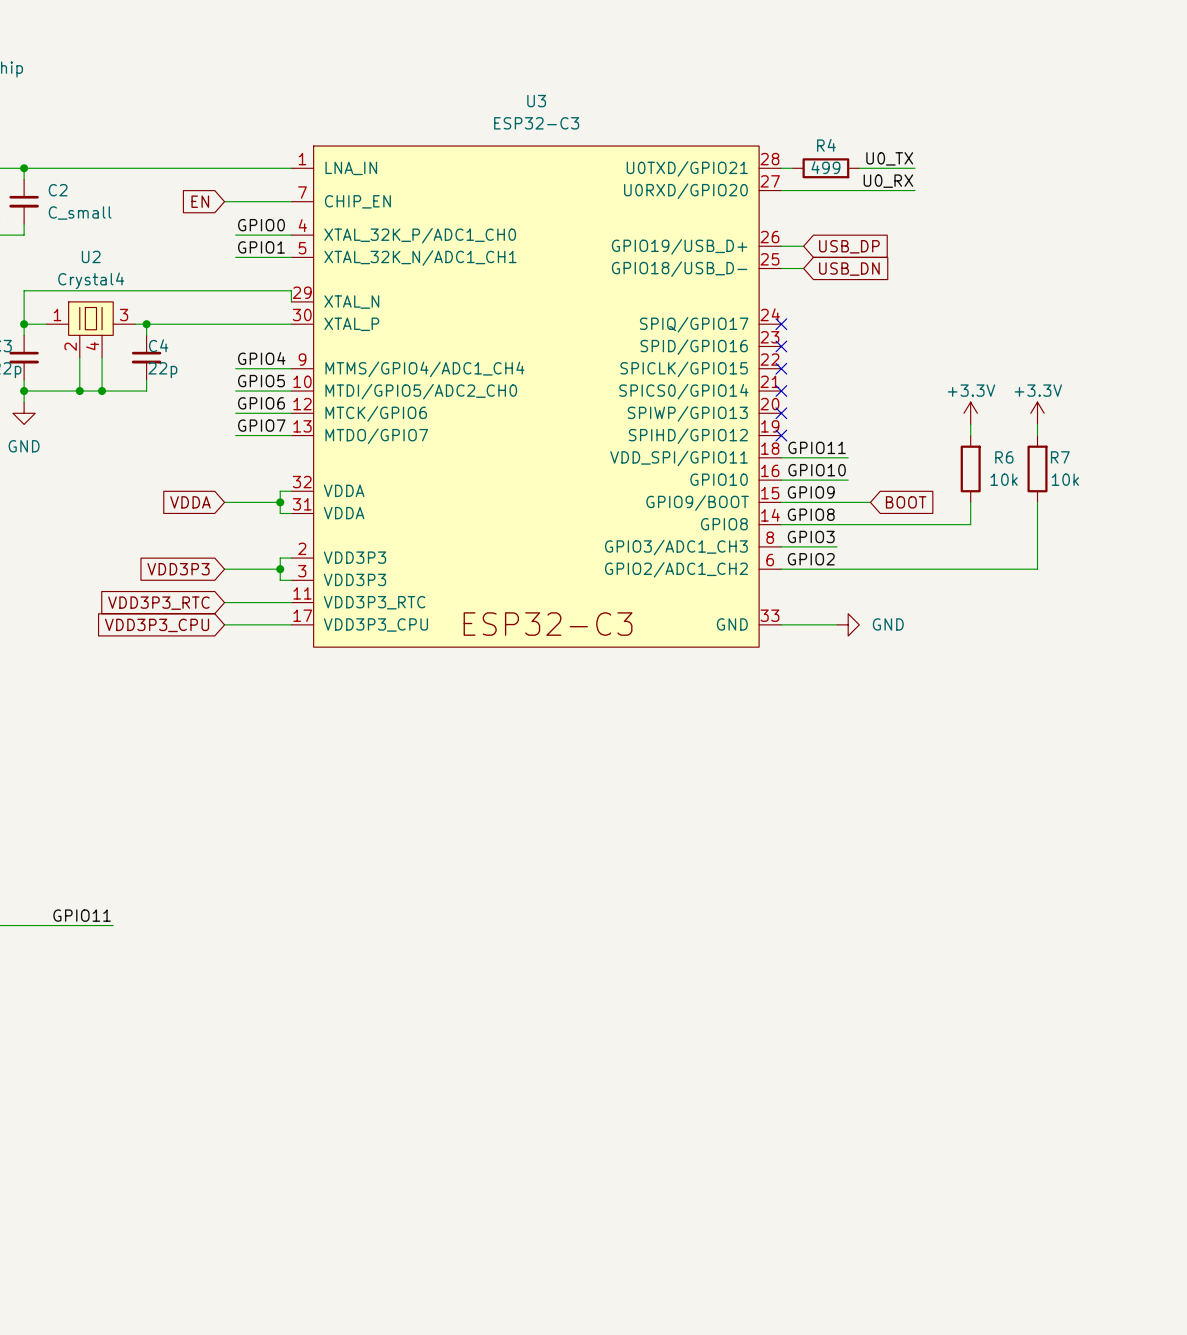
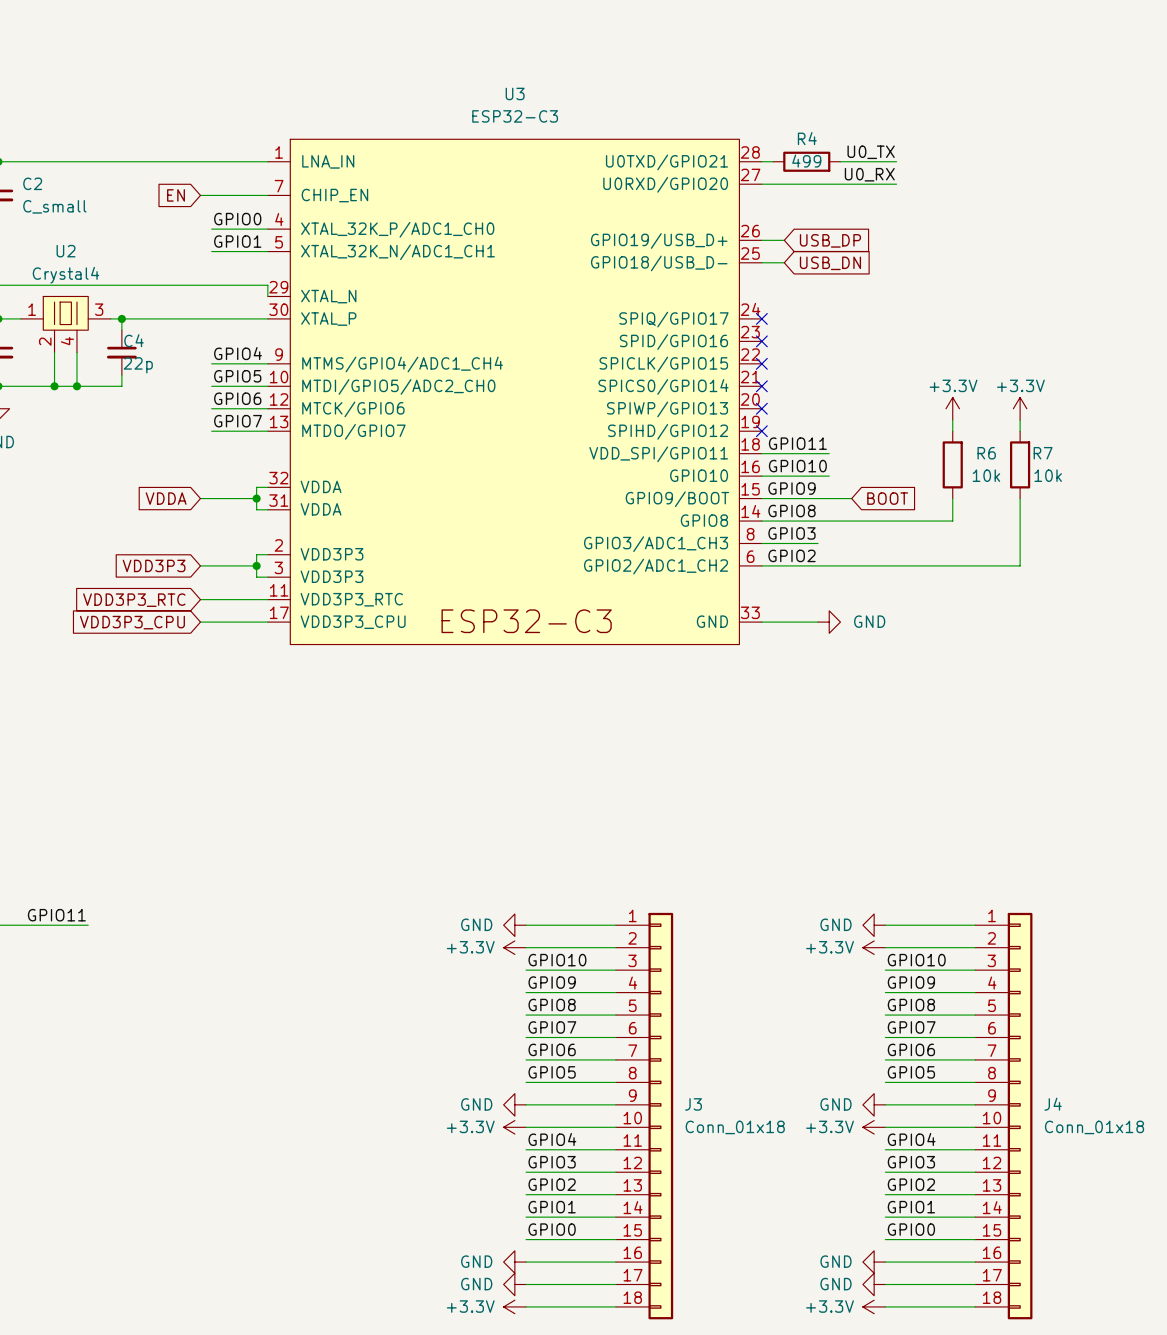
power symbol: none -> GND (514, 925)
wire: none -> (526, 925) (615, 925)
power symbol: none -> GND (874, 925)
wire: none -> (885, 925) (975, 925)
power symbol: none -> +3.3V (514, 947)
wire: none -> (526, 947) (615, 947)
power symbol: none -> +3.3V (874, 947)
wire: none -> (885, 947) (975, 947)
label: none -> GPIO10 (557, 960)
label: none -> GPIO10 (916, 960)
wire: none -> (526, 970) (615, 970)
wire: none -> (885, 970) (975, 970)
label: none -> GPIO9 (552, 982)
label: none -> GPIO9 (911, 982)
wire: none -> (526, 992) (615, 992)
wire: none -> (885, 992) (975, 992)
label: none -> GPIO8 (552, 1005)
label: none -> GPIO8 (911, 1005)
wire: none -> (526, 1015) (615, 1015)
wire: none -> (885, 1015) (975, 1015)
label: none -> GPIO7 (552, 1027)
label: none -> GPIO7 (911, 1027)
wire: none -> (526, 1037) (615, 1037)
wire: none -> (885, 1037) (975, 1037)
label: none -> GPIO6 (552, 1049)
label: none -> GPIO6 (911, 1049)
wire: none -> (526, 1059) (615, 1059)
wire: none -> (885, 1059) (975, 1059)
label: none -> GPIO5 (552, 1072)
label: none -> GPIO5 (911, 1072)
wire: none -> (526, 1082) (615, 1082)
wire: none -> (885, 1082) (975, 1082)
power symbol: none -> GND (514, 1104)
wire: none -> (526, 1104) (615, 1104)
power symbol: none -> GND (874, 1104)
wire: none -> (885, 1104) (975, 1104)
J3: none -> Conn_01x18 (644, 1116)
J4: none -> Conn_01x18 (1003, 1116)
power symbol: none -> +3.3V (514, 1127)
wire: none -> (526, 1127) (615, 1127)
power symbol: none -> +3.3V (874, 1127)
wire: none -> (885, 1127) (975, 1127)
label: none -> GPIO4 (552, 1139)
label: none -> GPIO4 (911, 1139)
wire: none -> (526, 1149) (615, 1149)
wire: none -> (885, 1149) (975, 1149)
label: none -> GPIO3 (552, 1162)
label: none -> GPIO3 (911, 1162)
wire: none -> (526, 1172) (615, 1172)
wire: none -> (885, 1172) (975, 1172)
label: none -> GPIO2 (552, 1184)
label: none -> GPIO2 (911, 1184)
wire: none -> (526, 1194) (615, 1194)
wire: none -> (885, 1194) (975, 1194)
label: none -> GPIO1 (552, 1207)
label: none -> GPIO1 (911, 1207)
wire: none -> (526, 1217) (615, 1217)
wire: none -> (885, 1217) (975, 1217)
label: none -> GPIO0 (552, 1229)
label: none -> GPIO0 (911, 1229)
wire: none -> (526, 1239) (615, 1239)
wire: none -> (885, 1239) (975, 1239)
power symbol: none -> GND (514, 1262)
wire: none -> (526, 1262) (615, 1262)
power symbol: none -> GND (874, 1262)
wire: none -> (885, 1262) (975, 1262)
power symbol: none -> GND (514, 1284)
wire: none -> (526, 1284) (615, 1284)
power symbol: none -> GND (874, 1284)
wire: none -> (885, 1284) (975, 1284)
power symbol: none -> +3.3V (514, 1306)
wire: none -> (526, 1306) (615, 1306)
power symbol: none -> +3.3V (874, 1306)
wire: none -> (885, 1306) (975, 1306)

